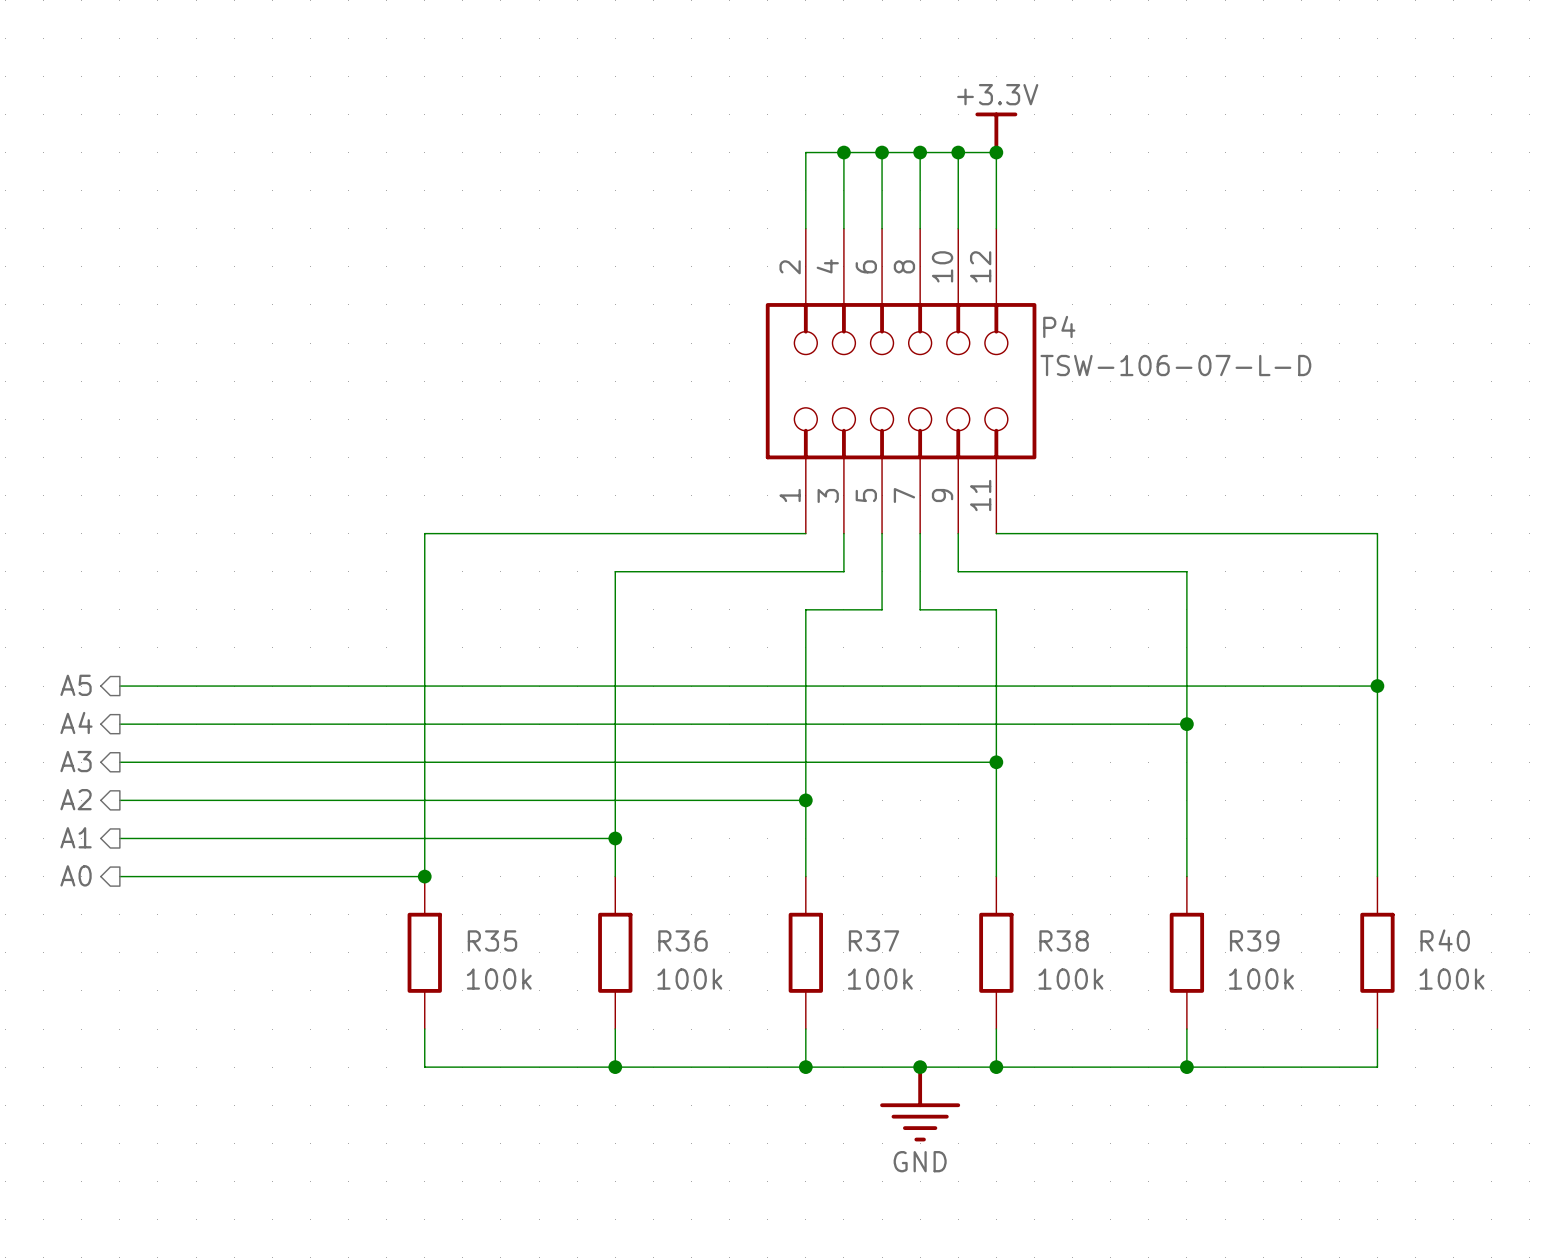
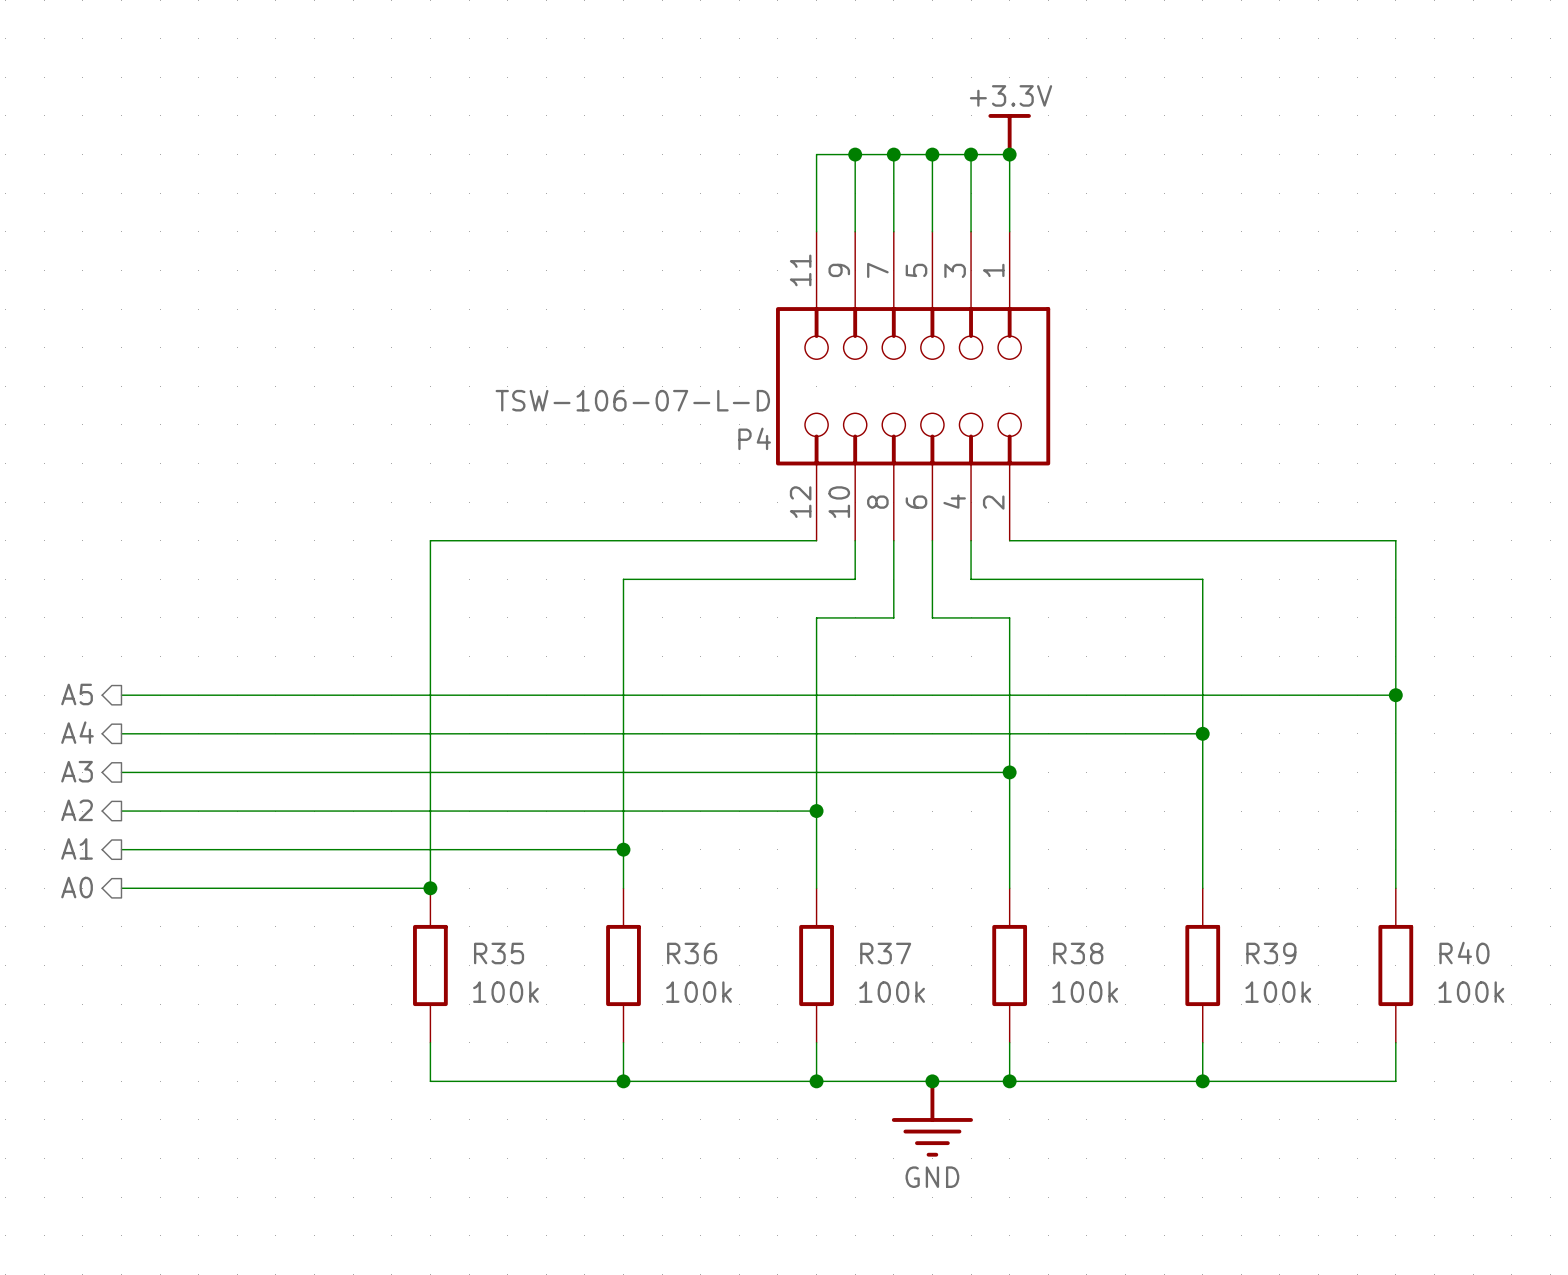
P4 rotation: 0° (901, 381) -> 180° (913, 386)

